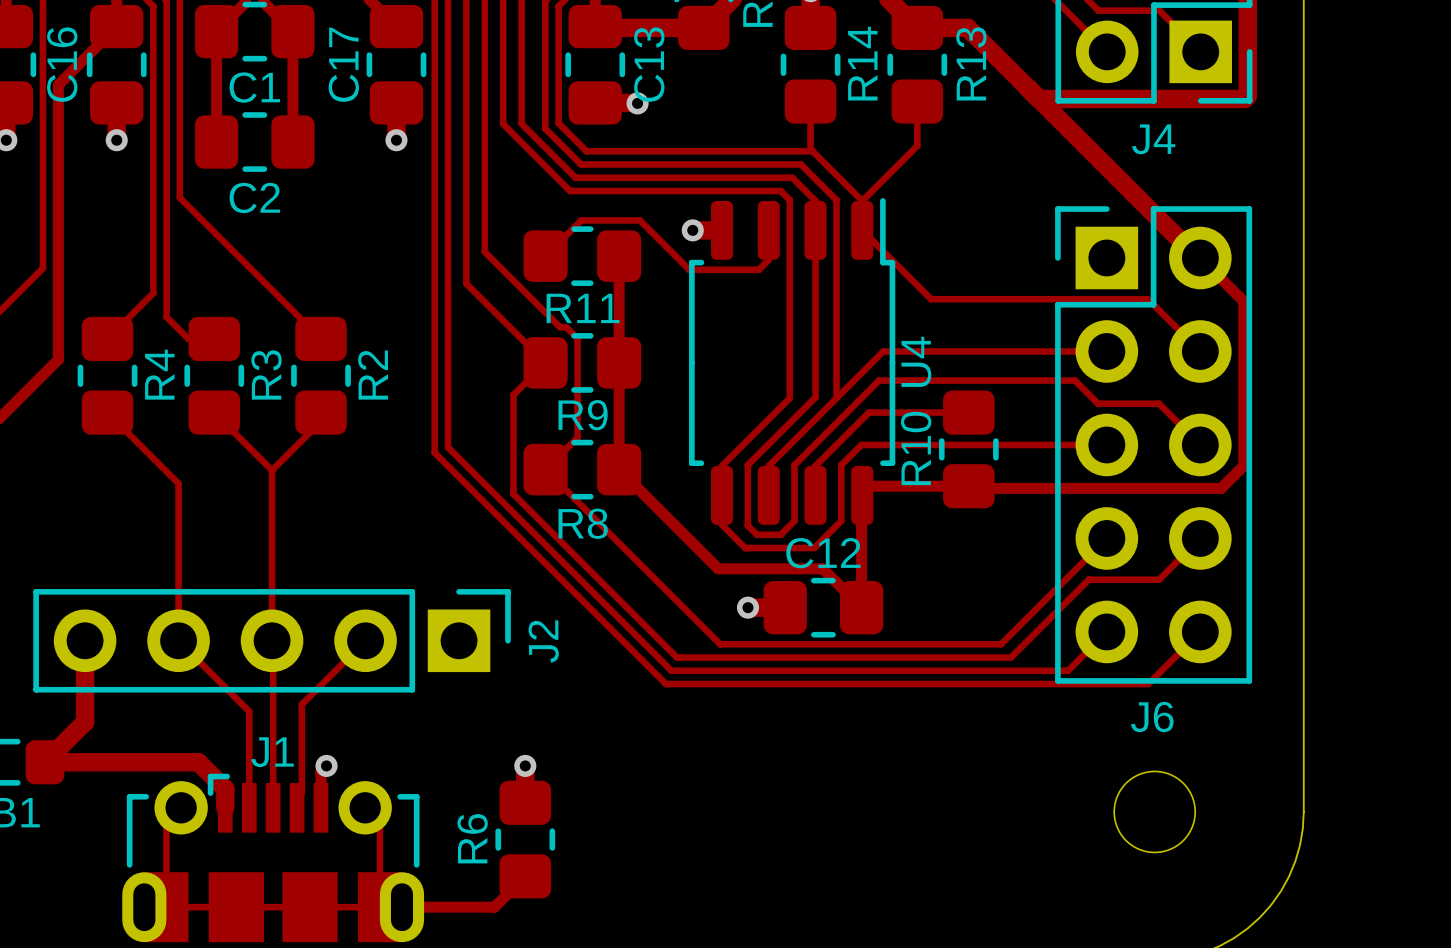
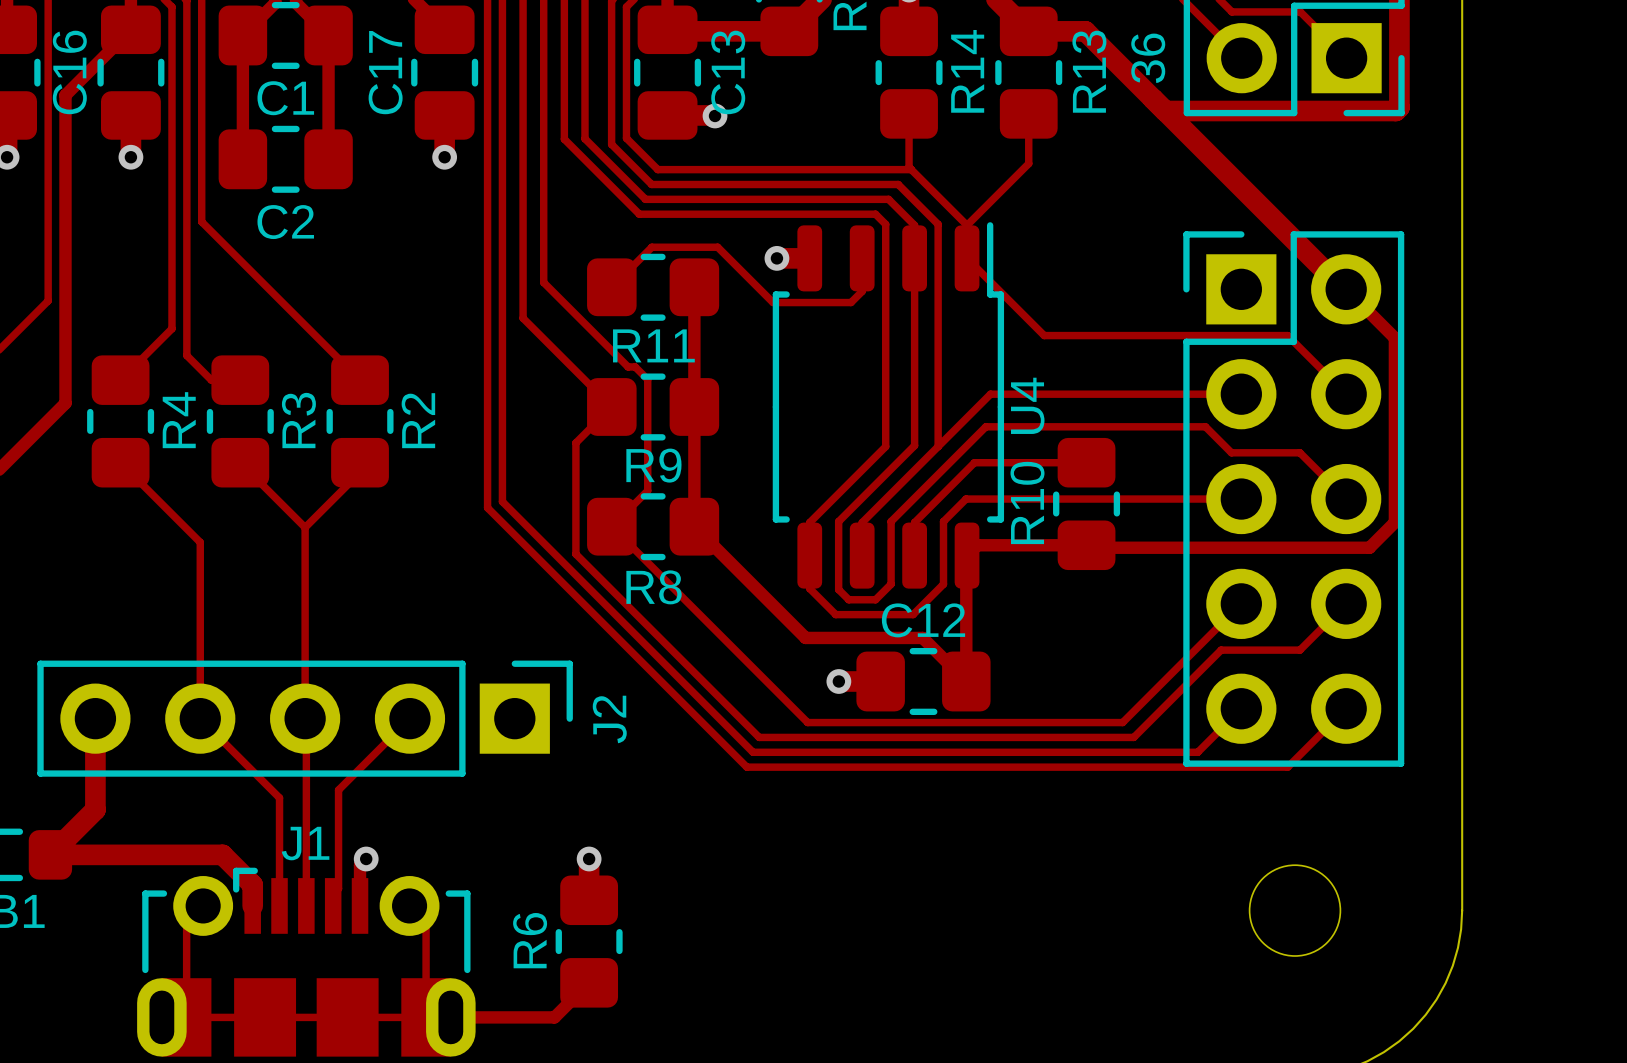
text: none -> 36 (1148, 58)
J4 name: J4 (1153, 139) -> none
J6 name: J6 (1152, 716) -> none

